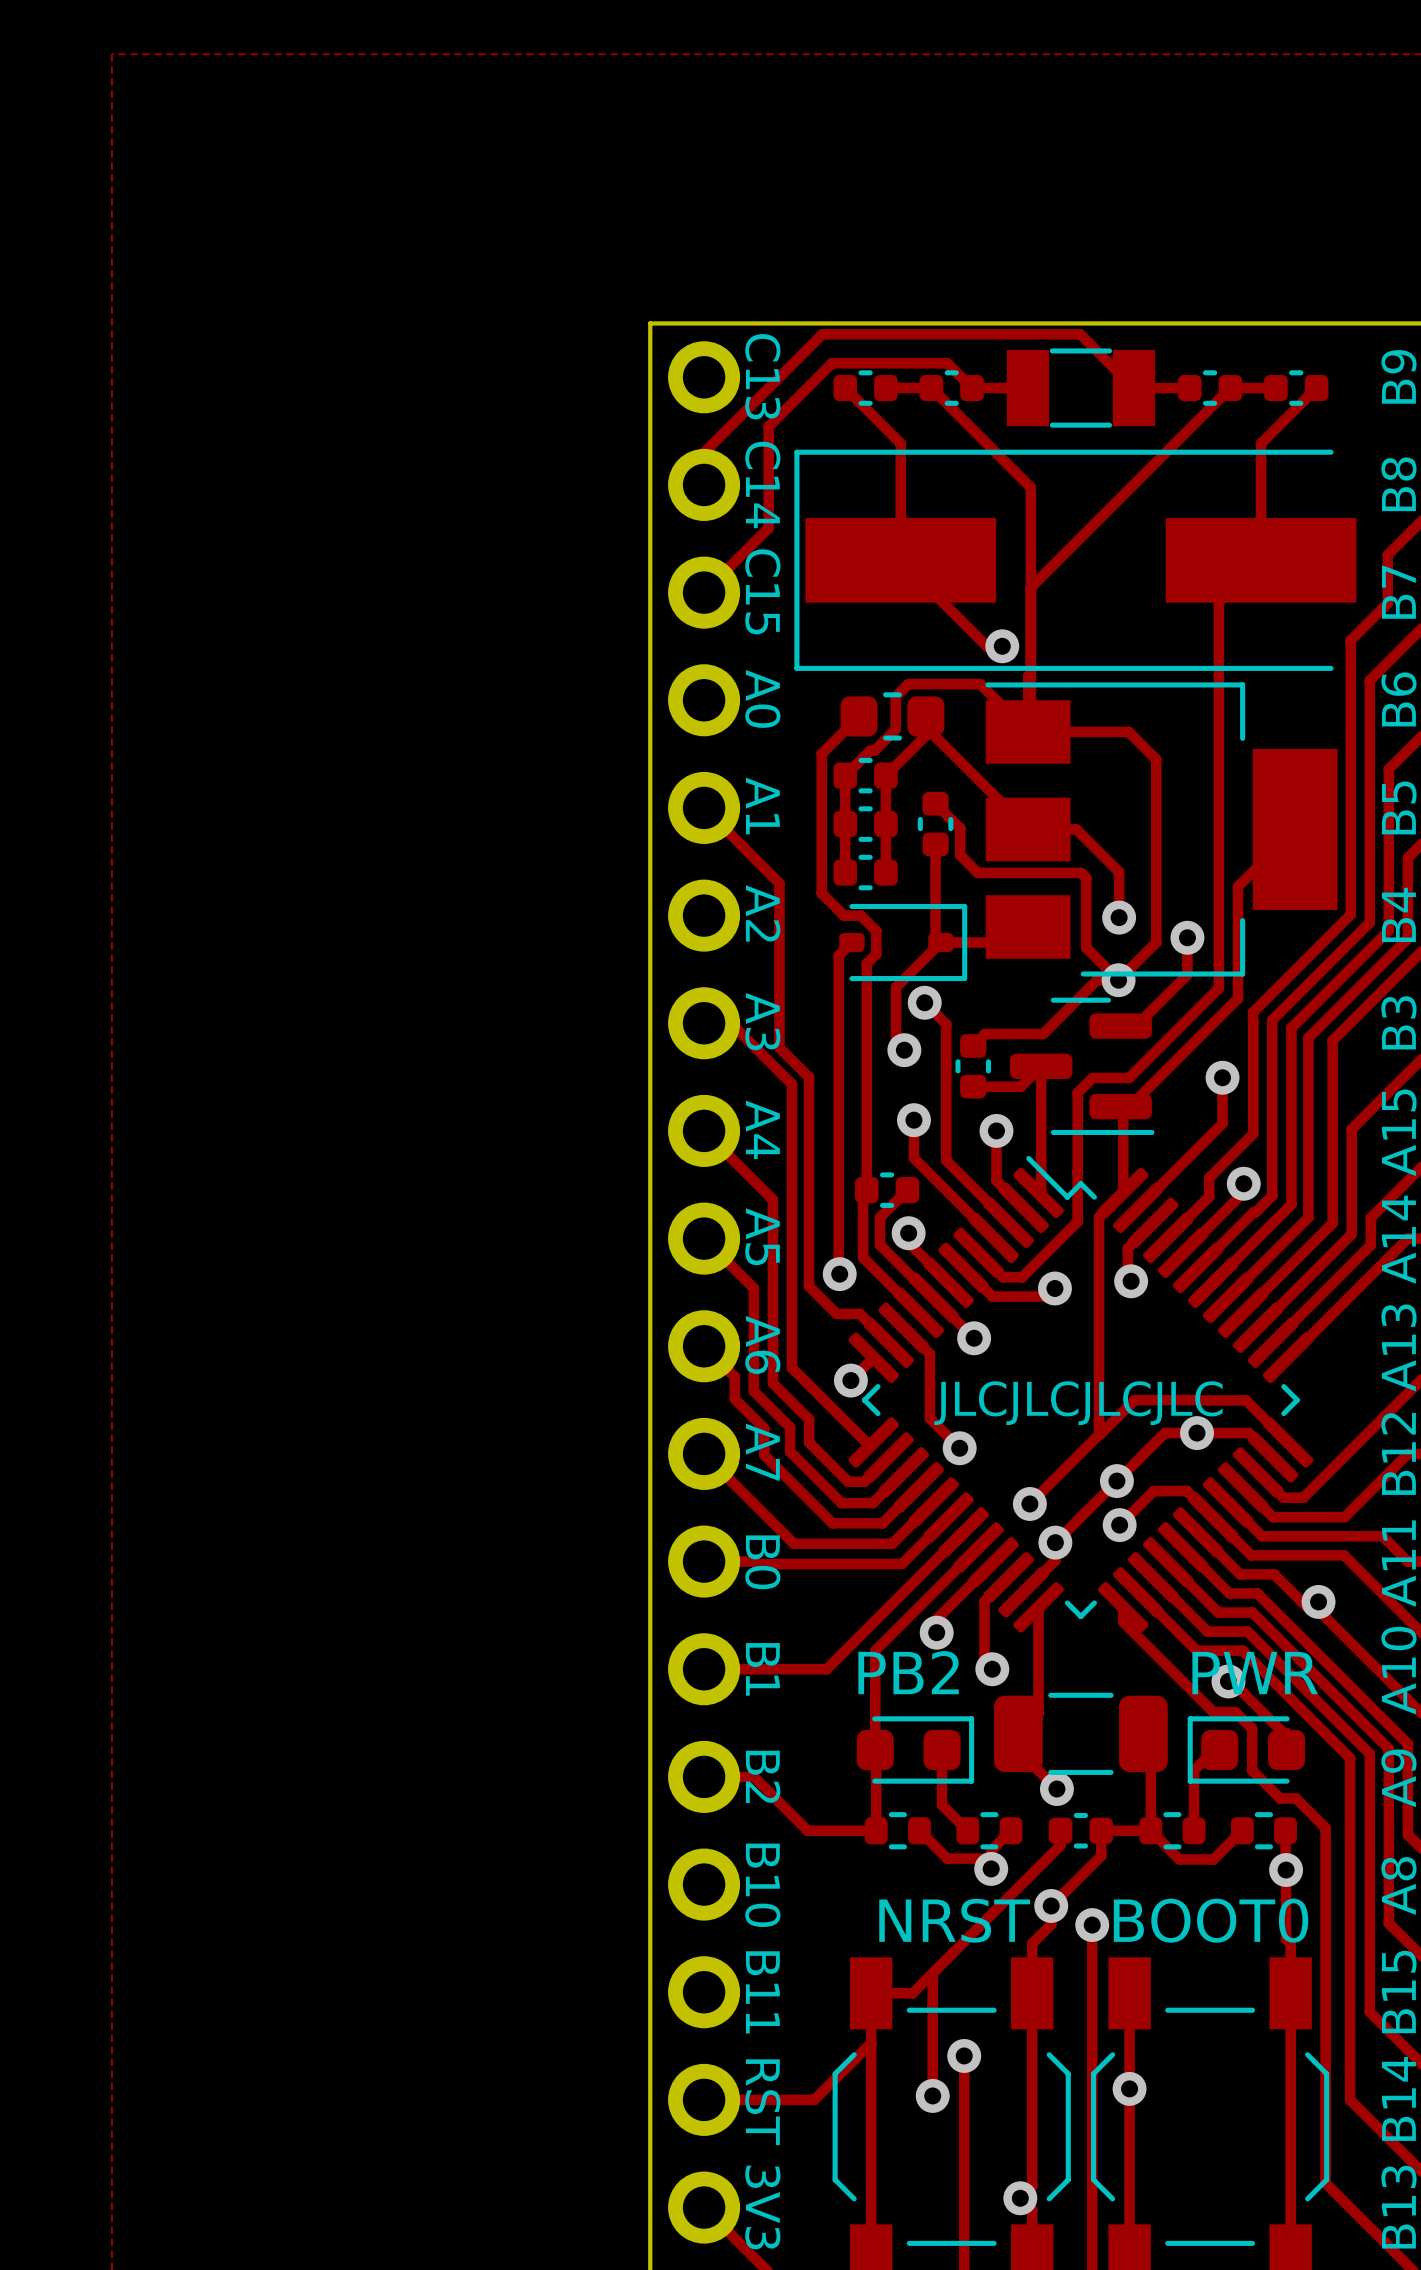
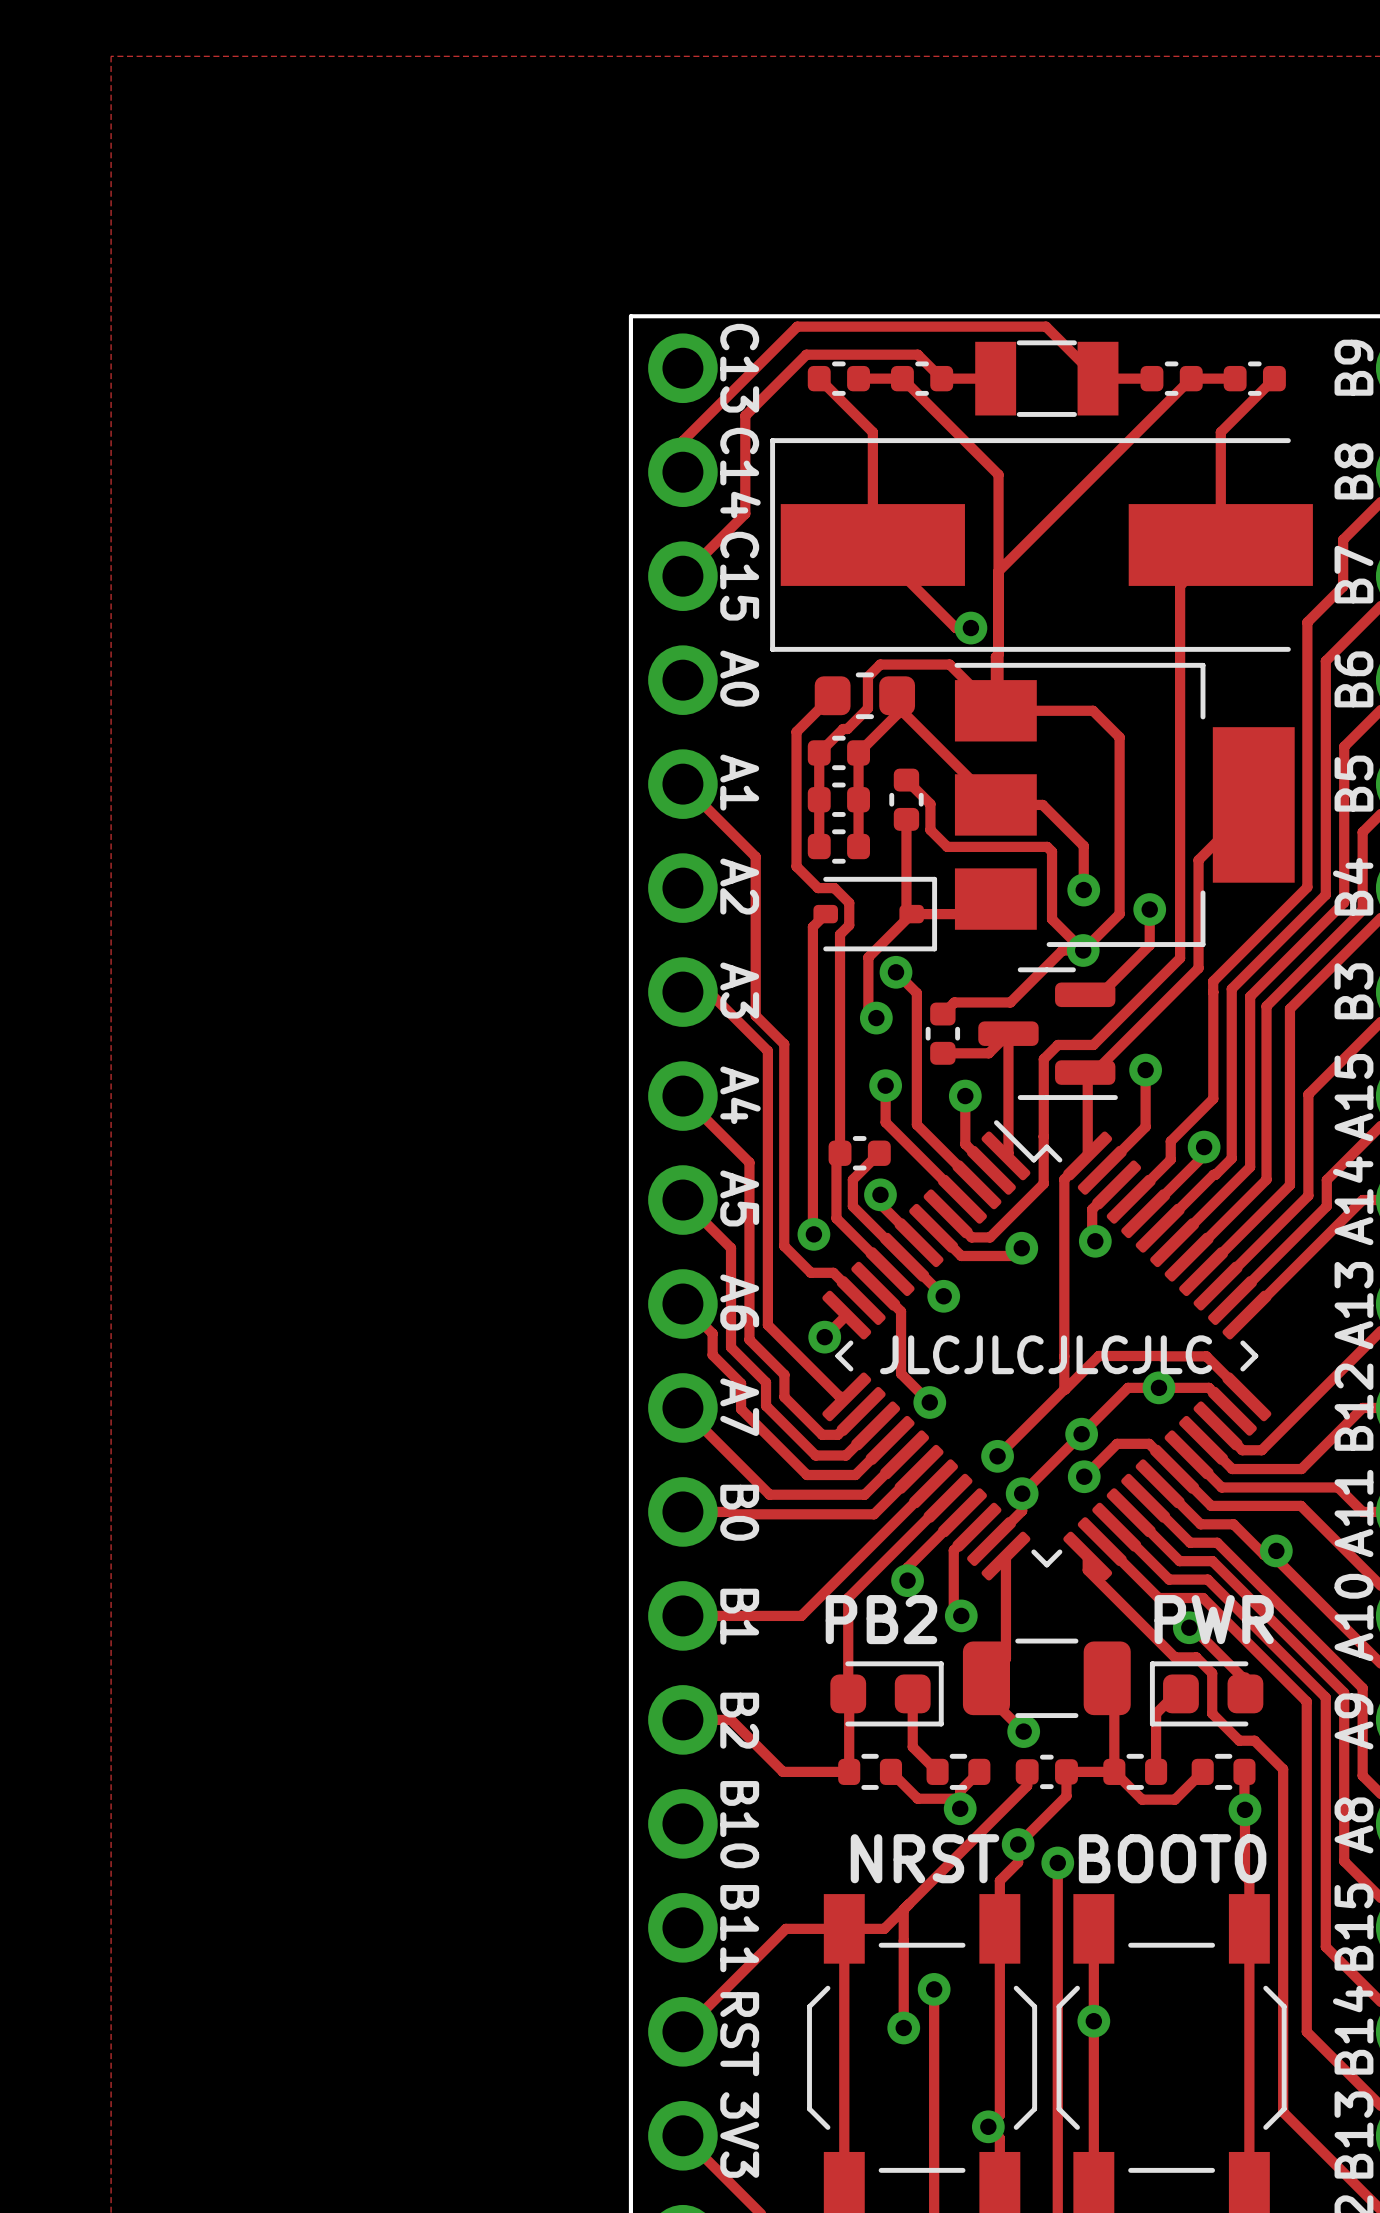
track: (1222, 1077) (1222, 1123) (1183, 1162) -> (1145, 1070) (1145, 1126)
via position: (1222, 1077) -> (1145, 1070)
track: (871, 2043) (814, 2099) (704, 2099) -> (844, 1928) (785, 1928) (682, 2031)

